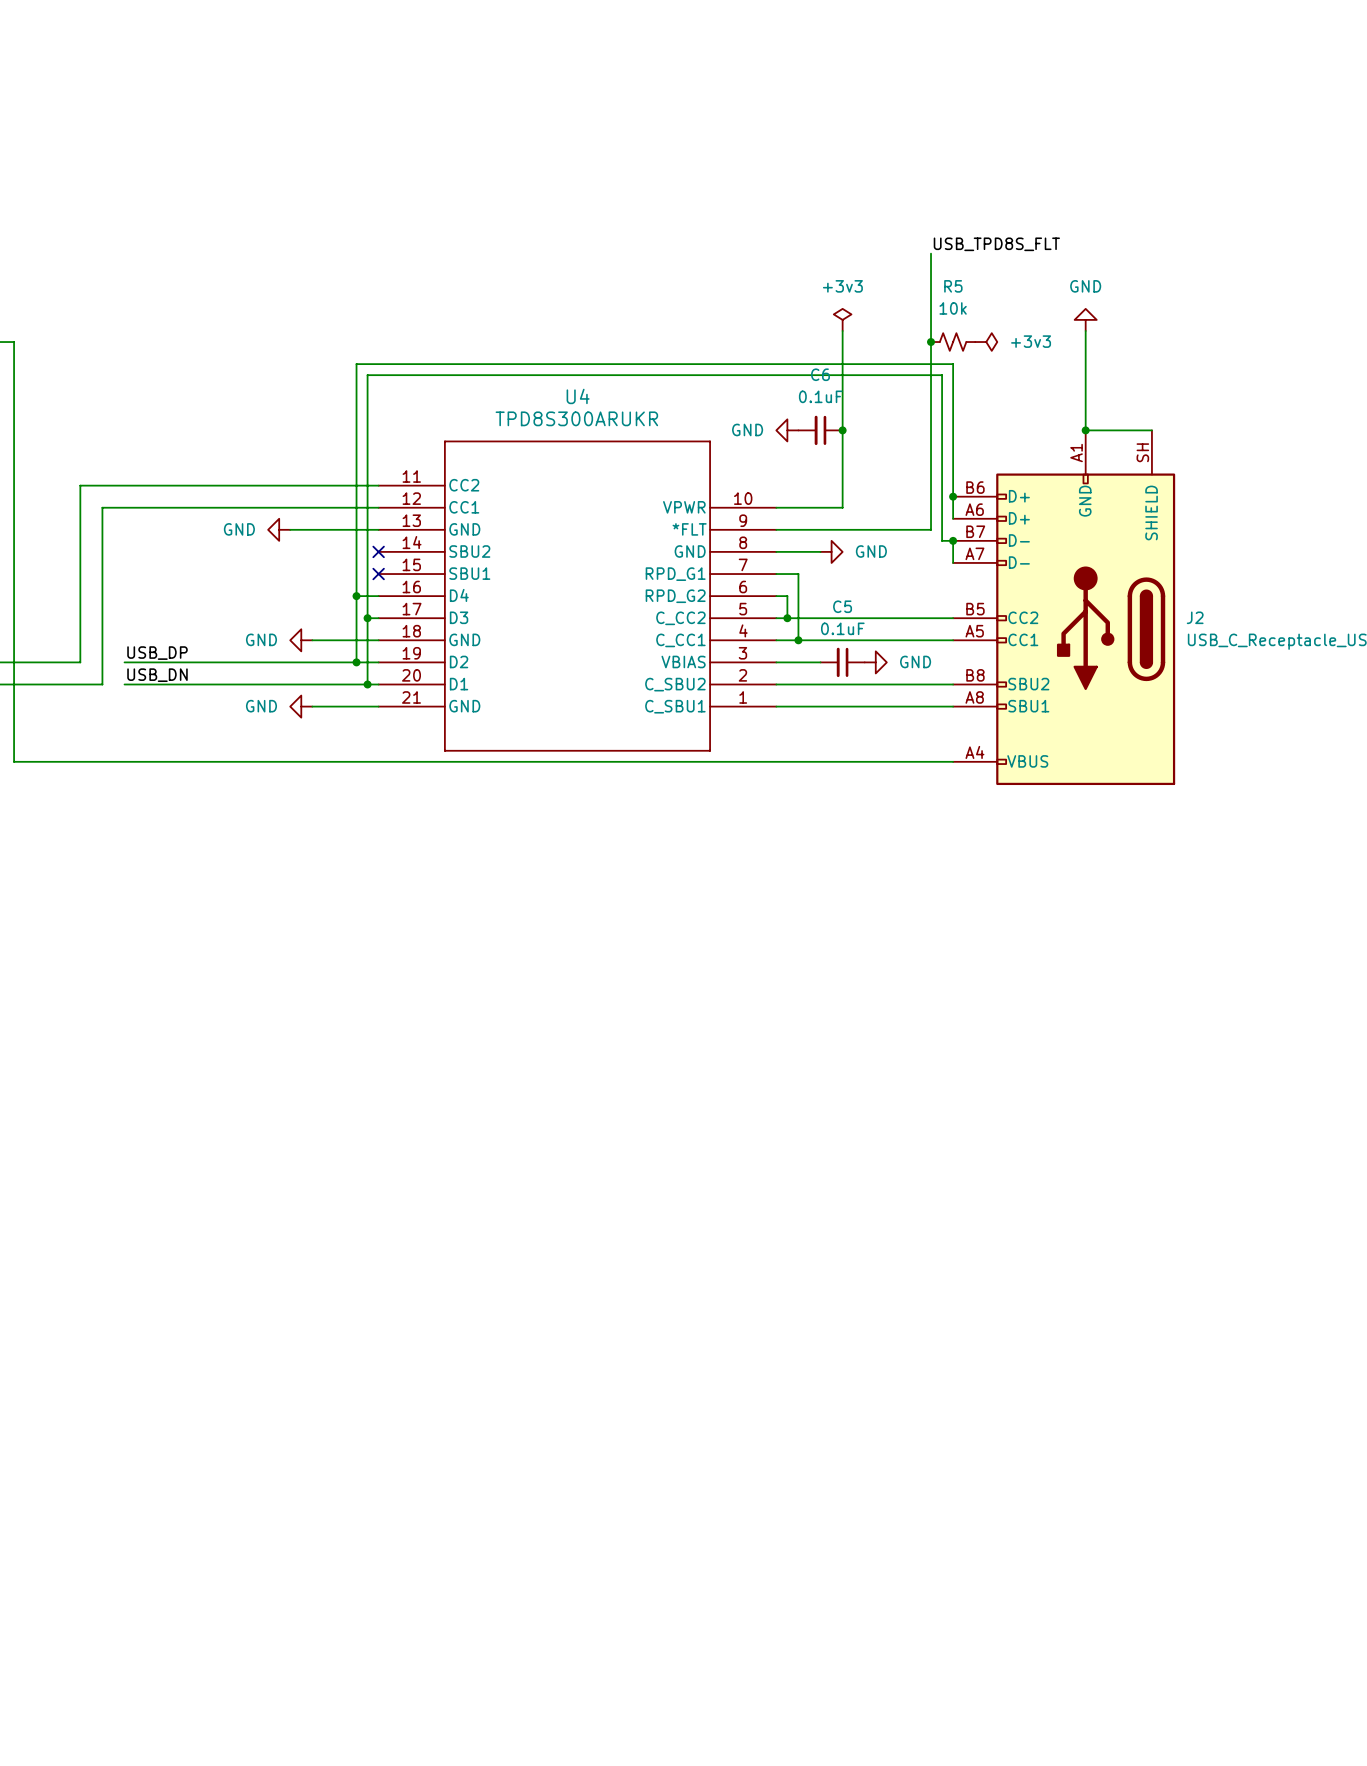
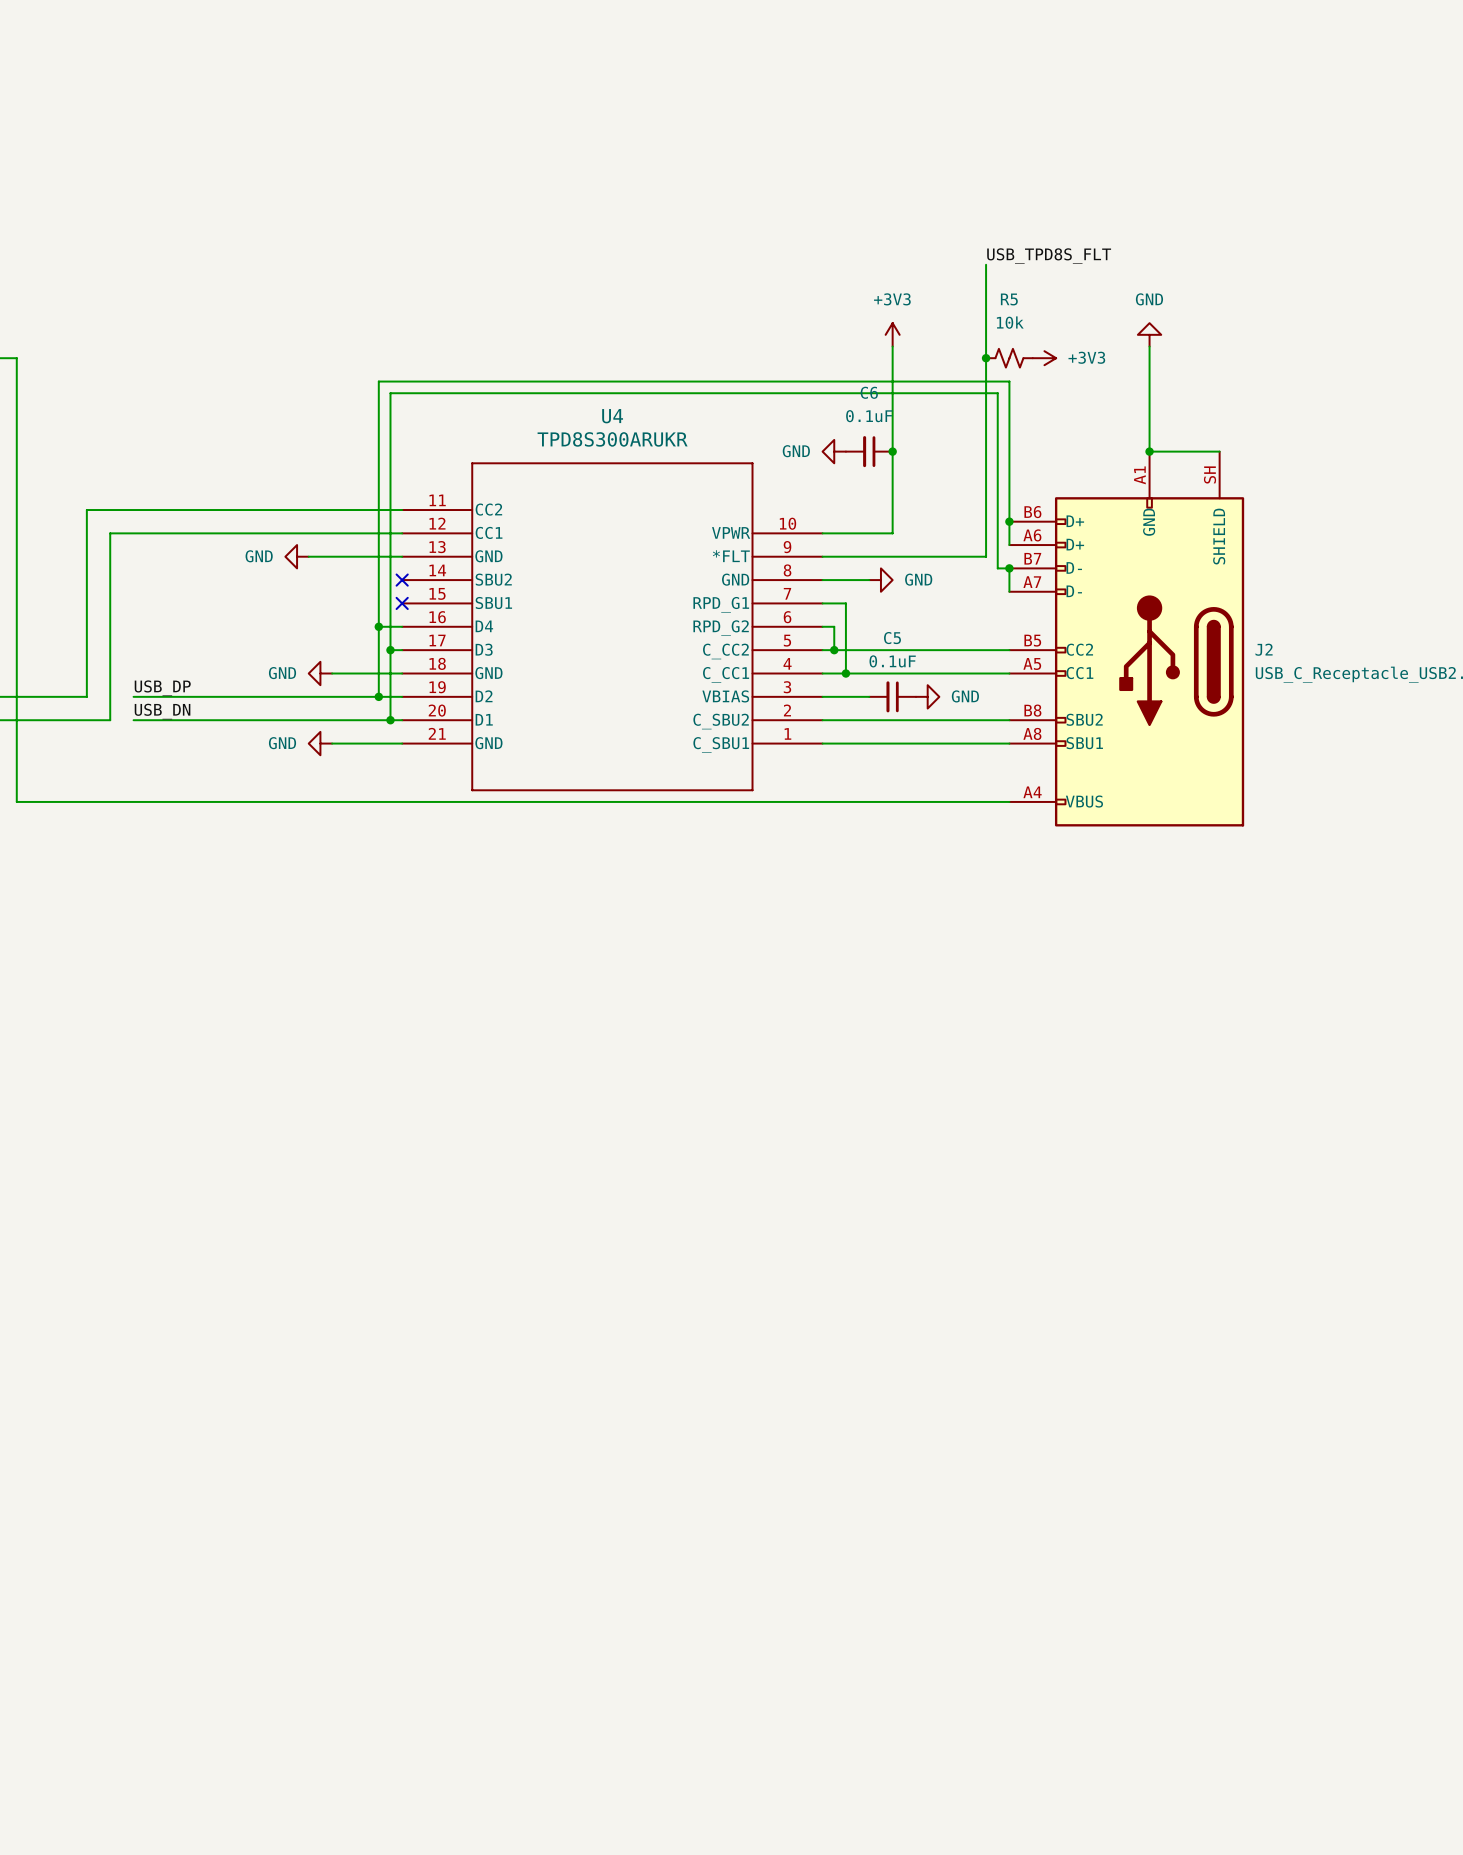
power symbol: +3v3 (842, 319) -> +3V3 (892, 334)
power symbol: +3v3 (986, 342) -> +3V3 (1044, 358)

